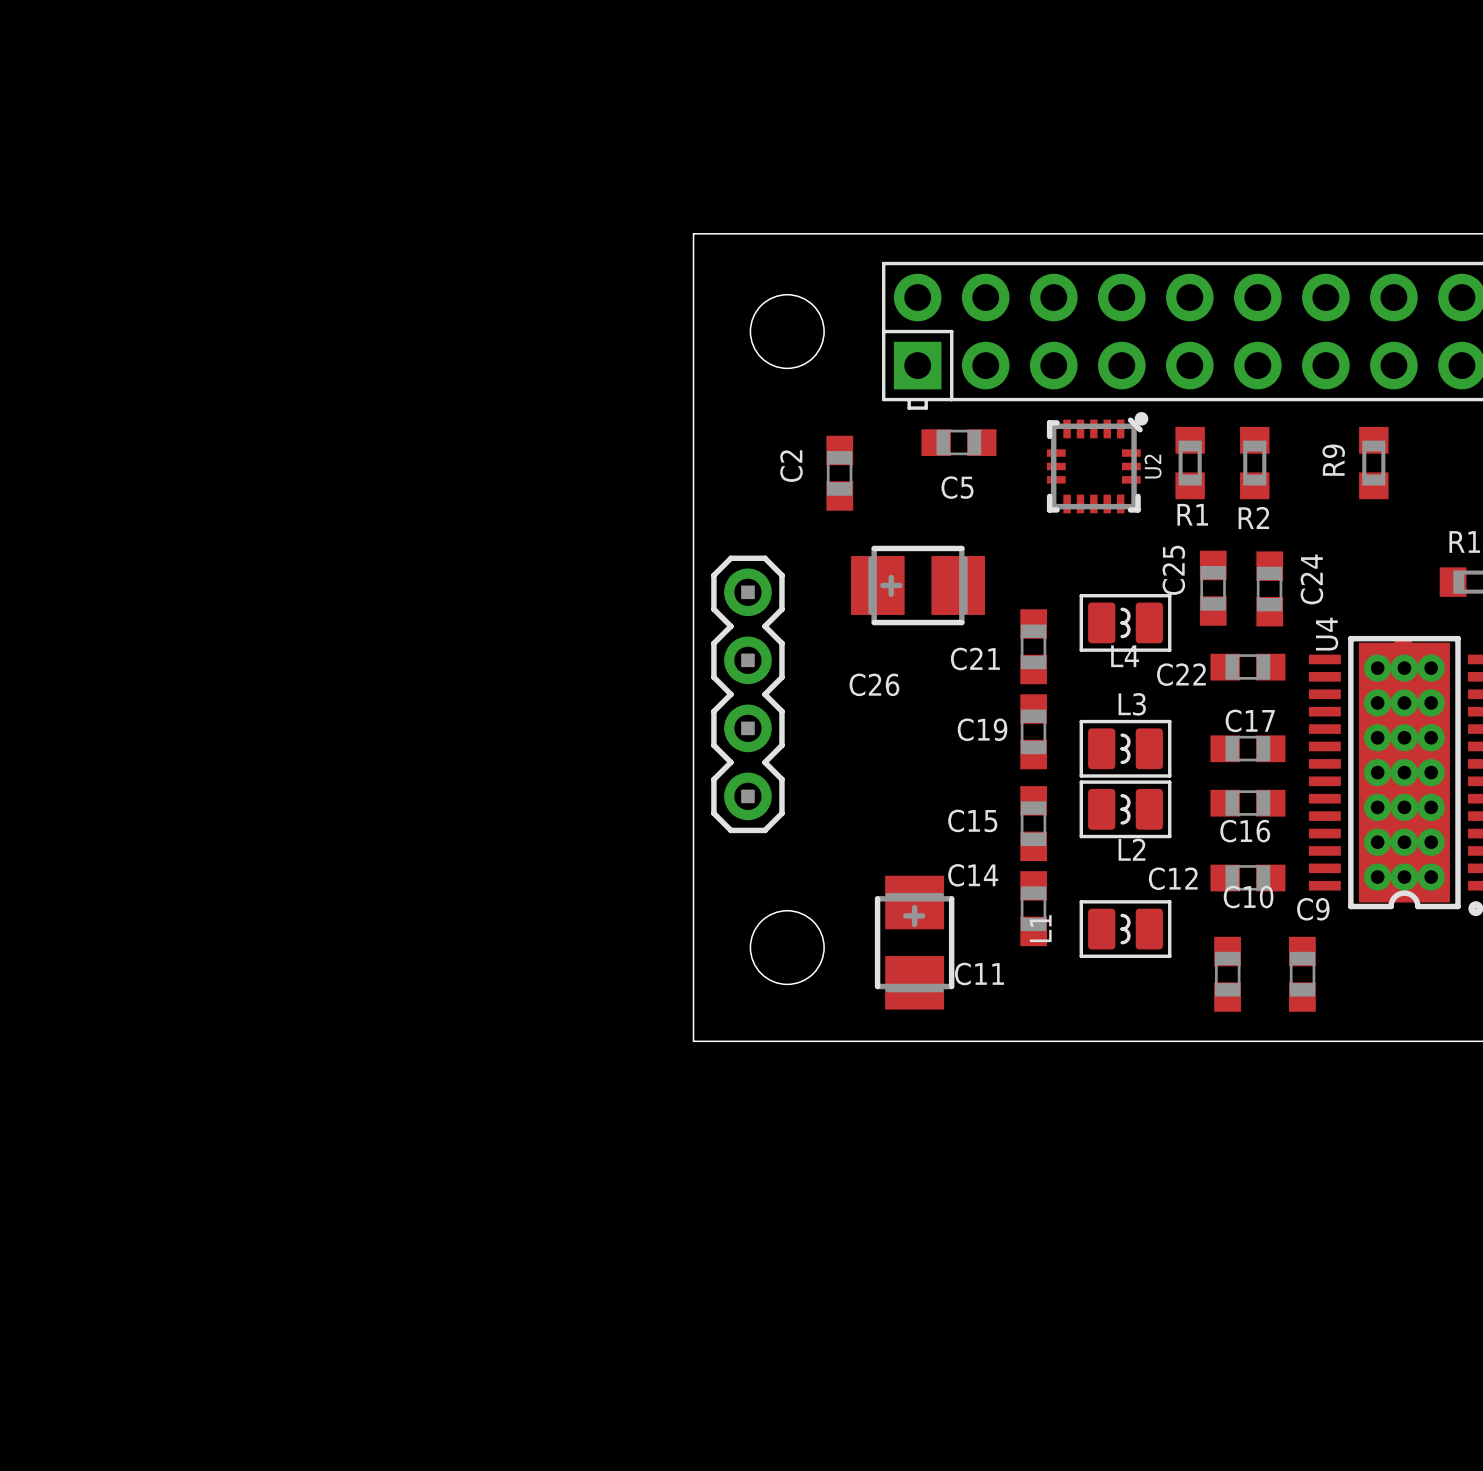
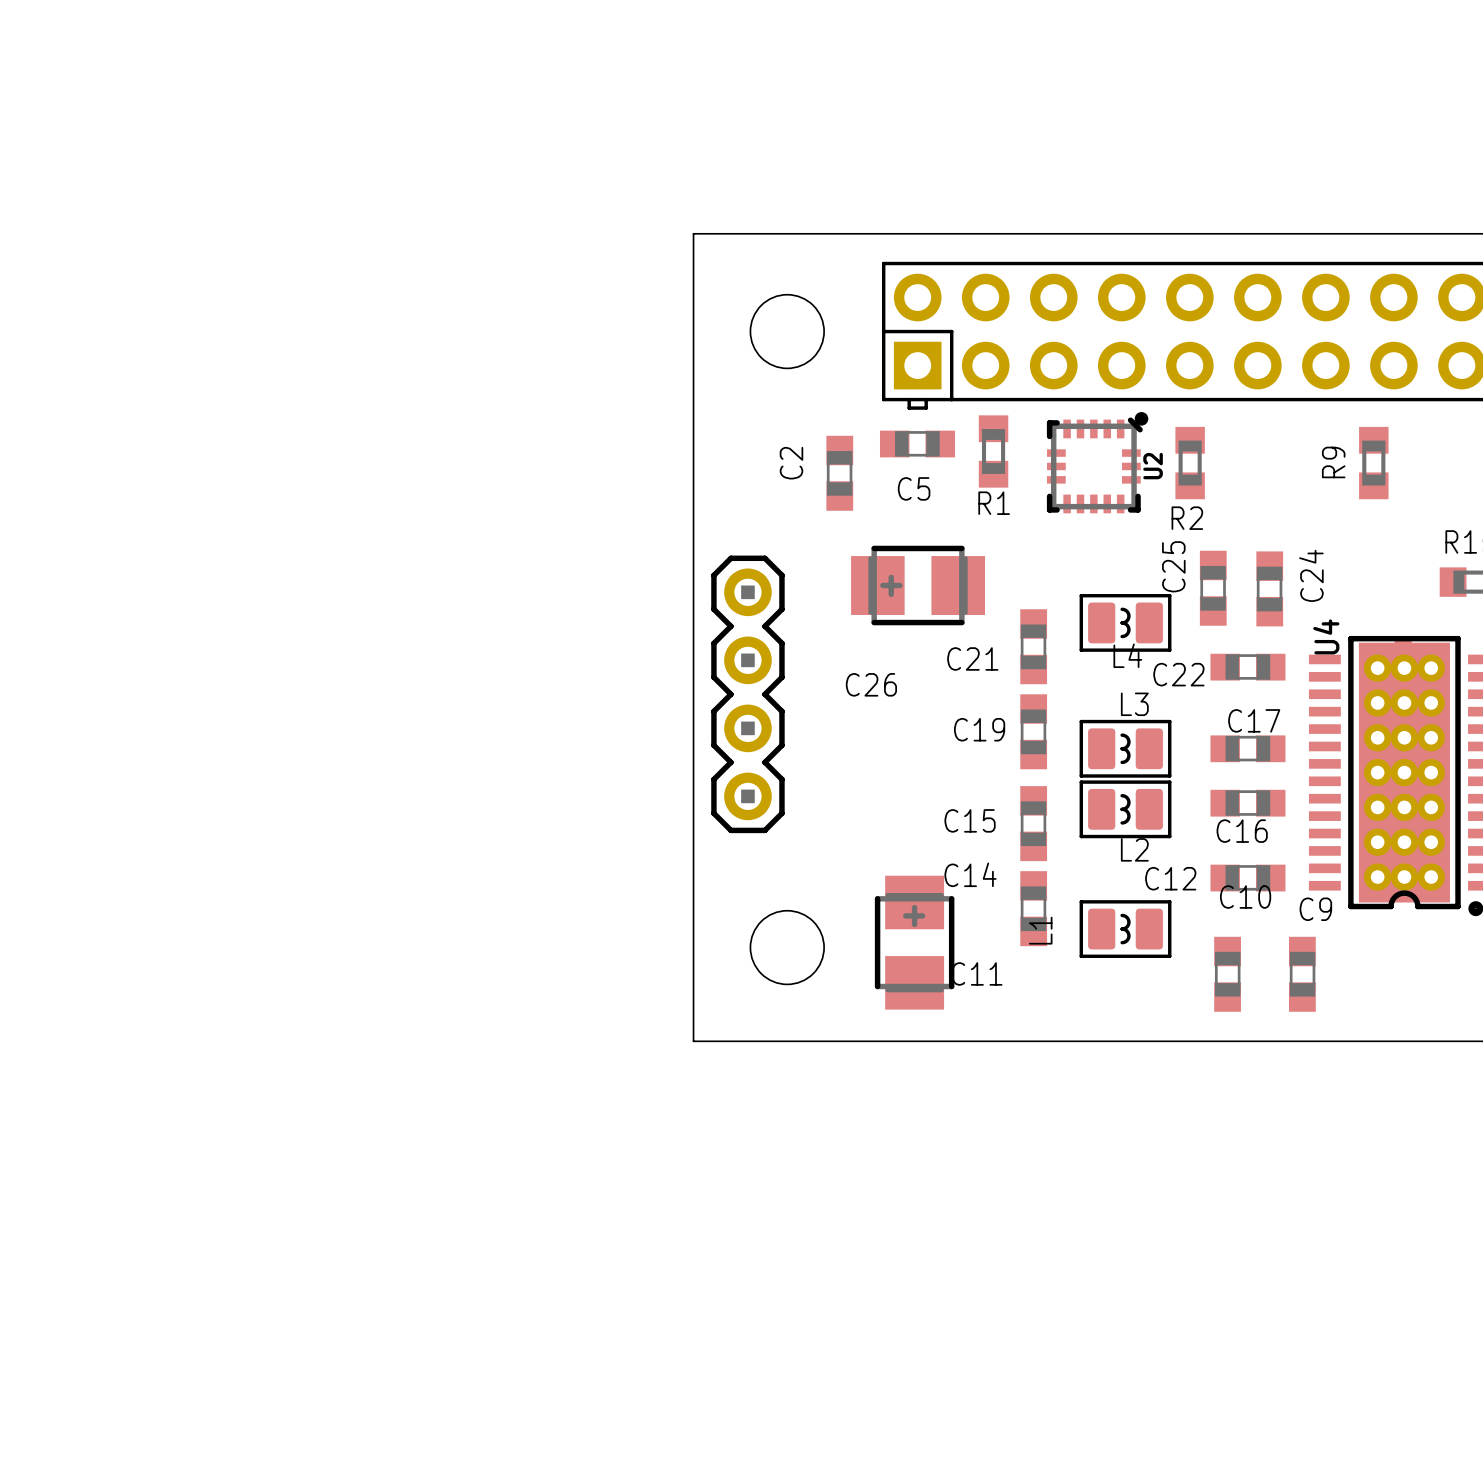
C5 position: (958, 442) -> (917, 444)
R1: none -> (993, 451)
R2: (1254, 463) -> none
R1 name: R1 (1192, 514) -> R2 (1187, 518)

